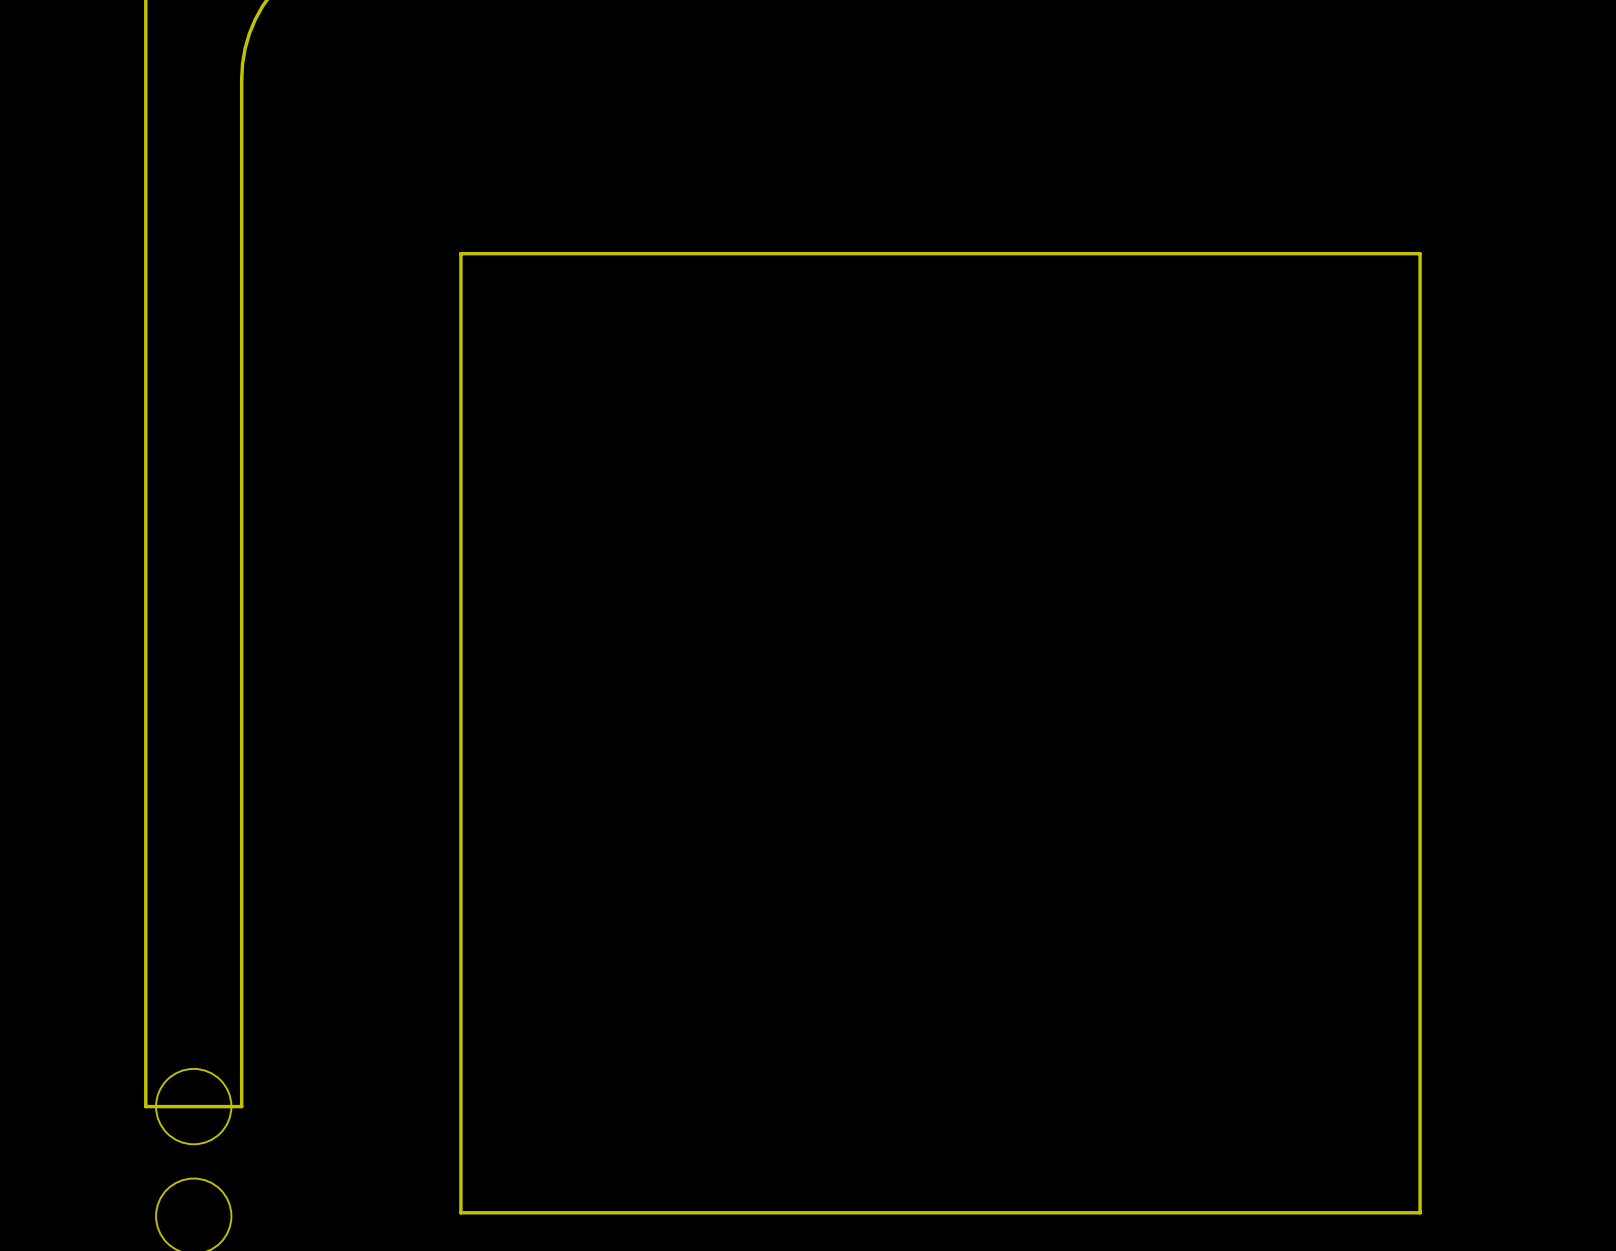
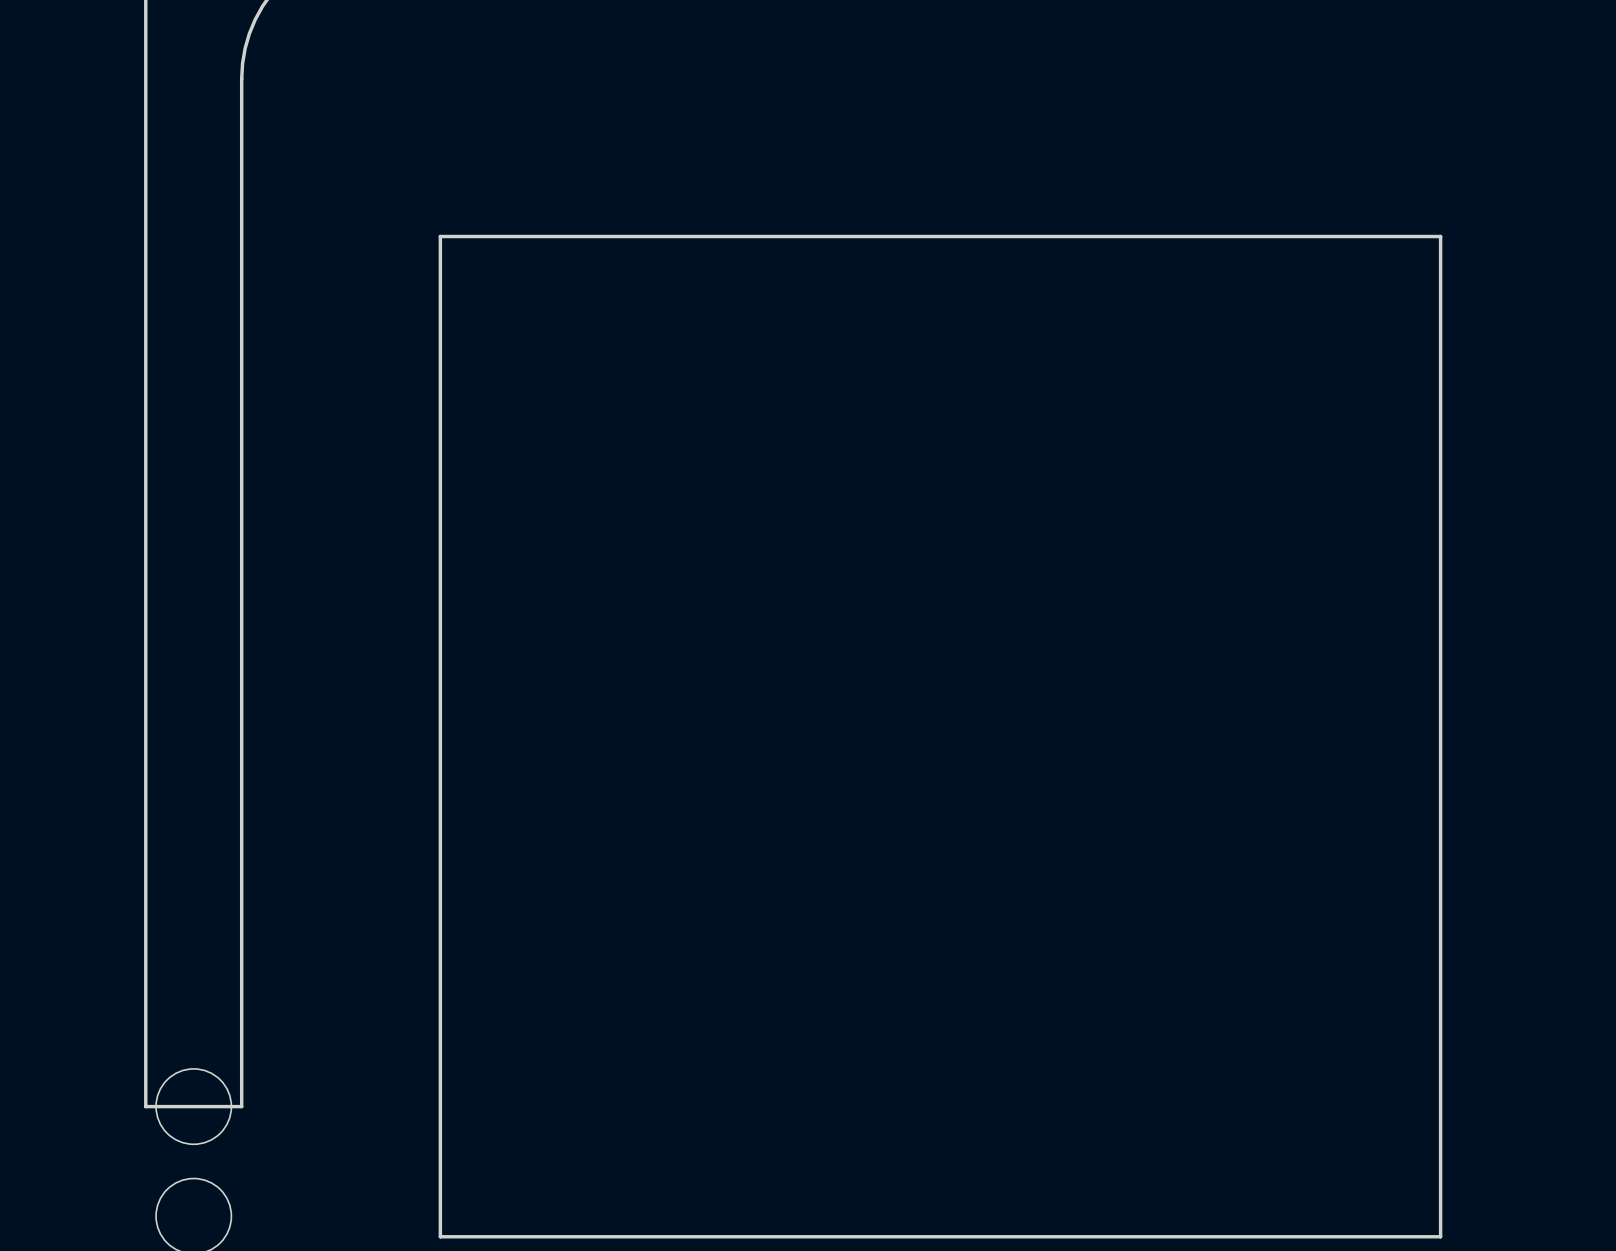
board edge: (460, 253) (1420, 253) (1420, 1212) (460, 1212) (460, 253) -> (440, 236) (440, 1236) (1440, 1236) (1440, 236) (440, 236)

